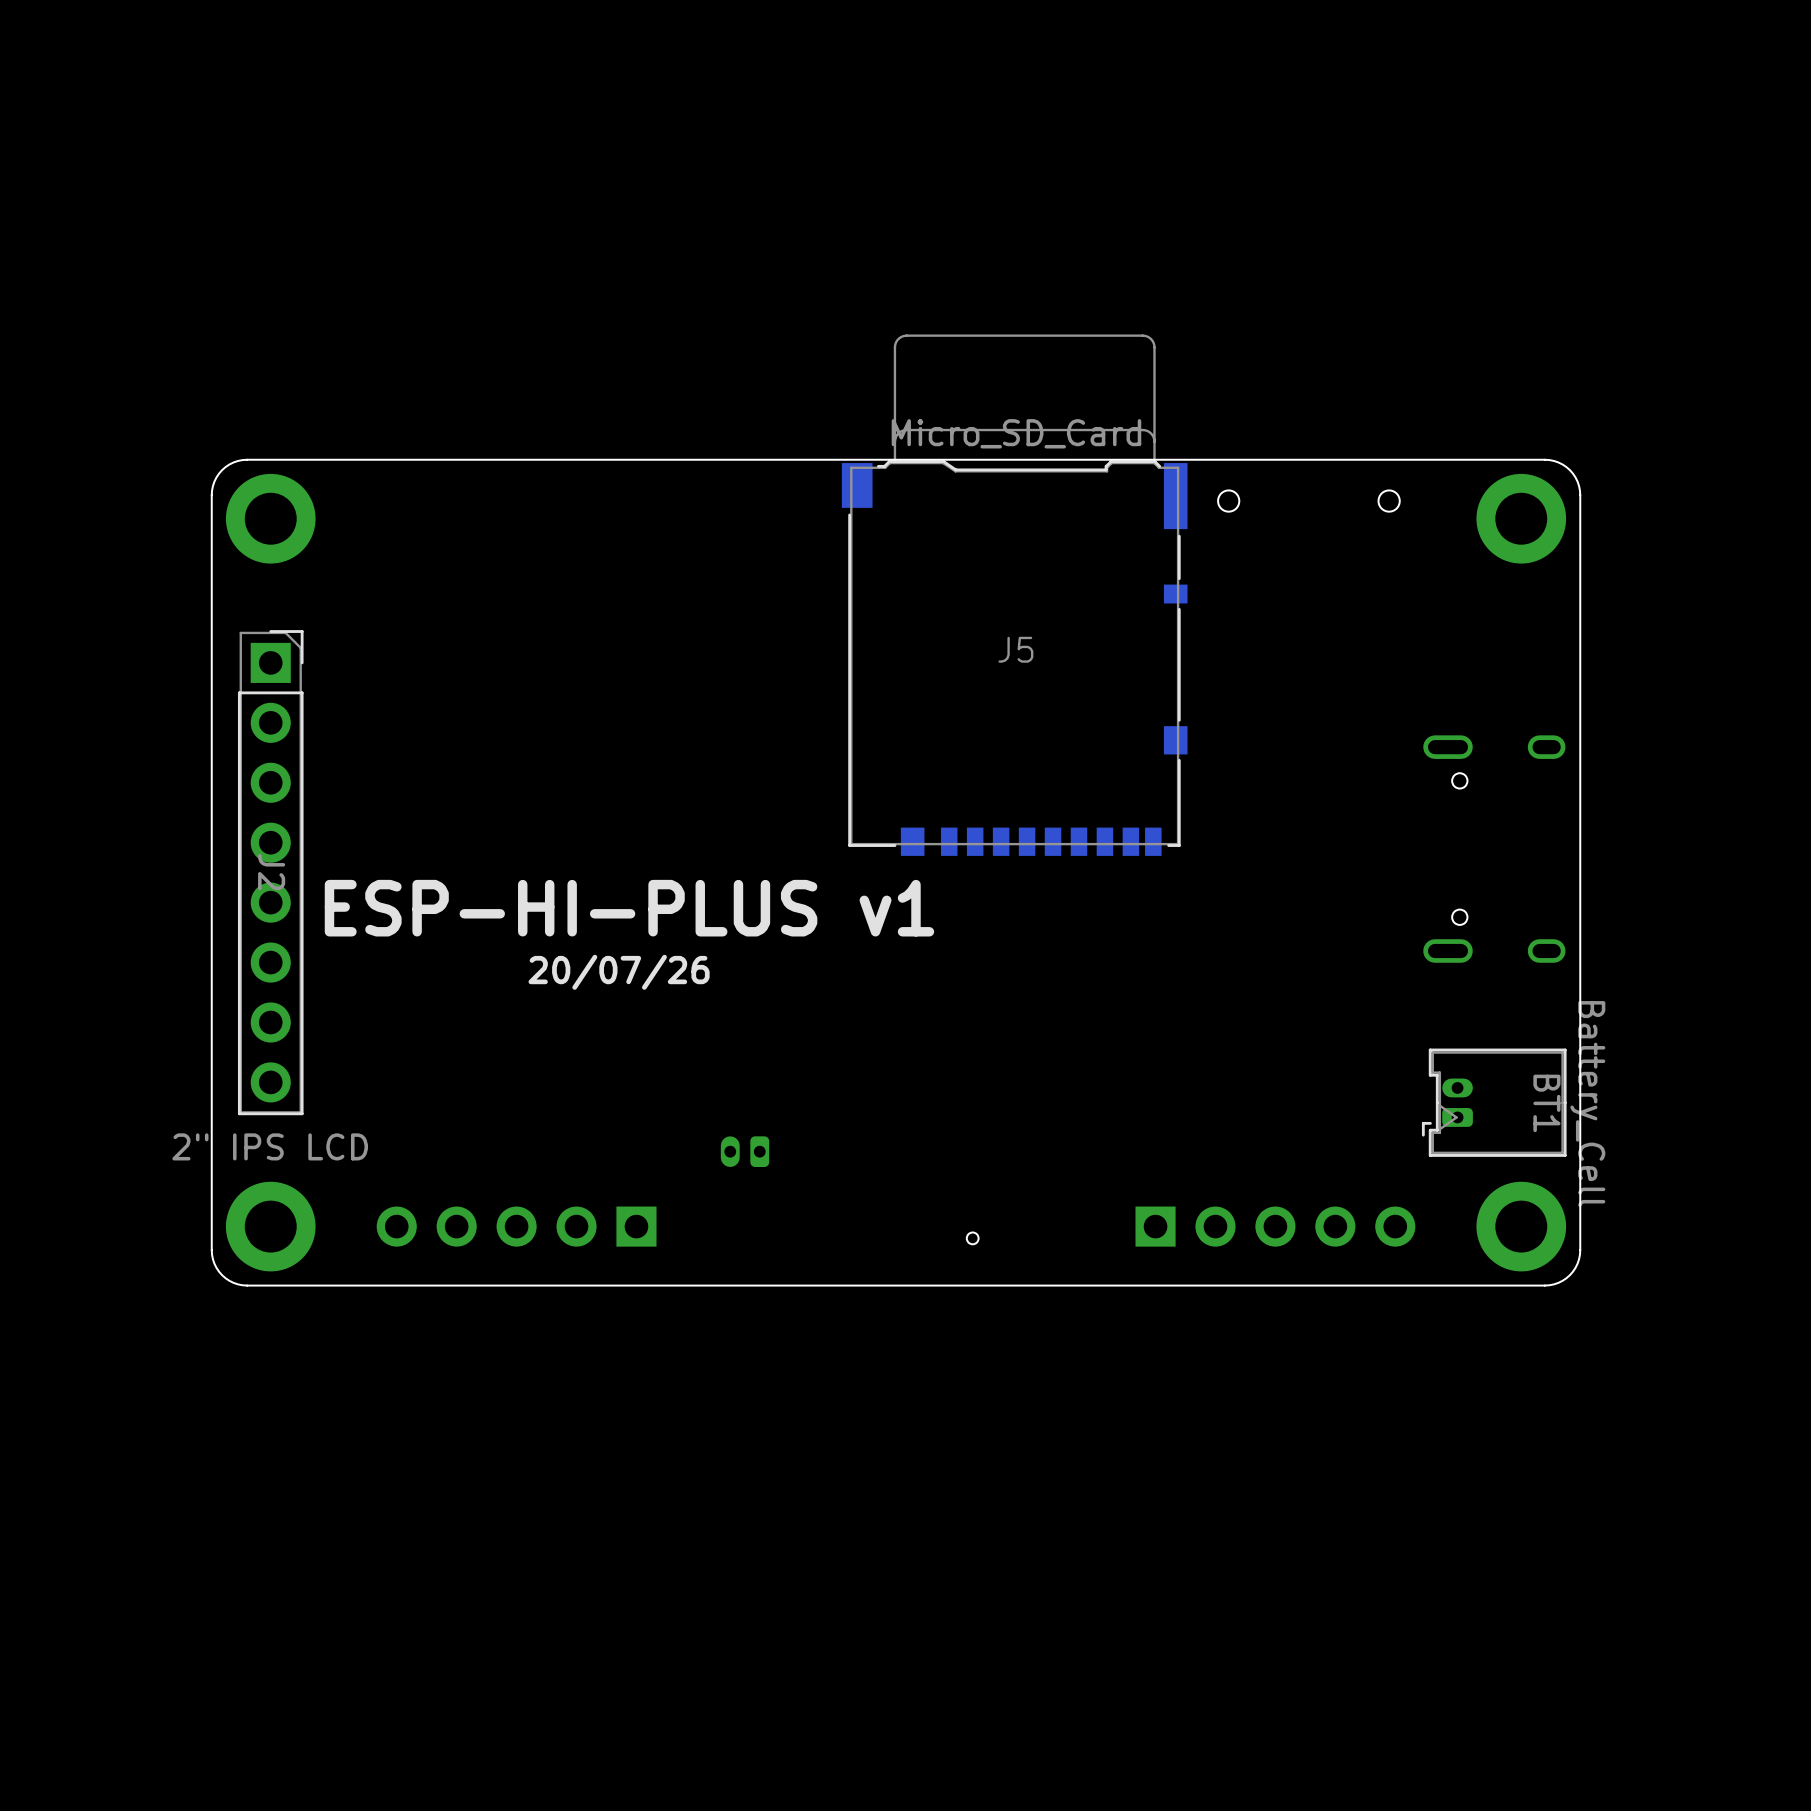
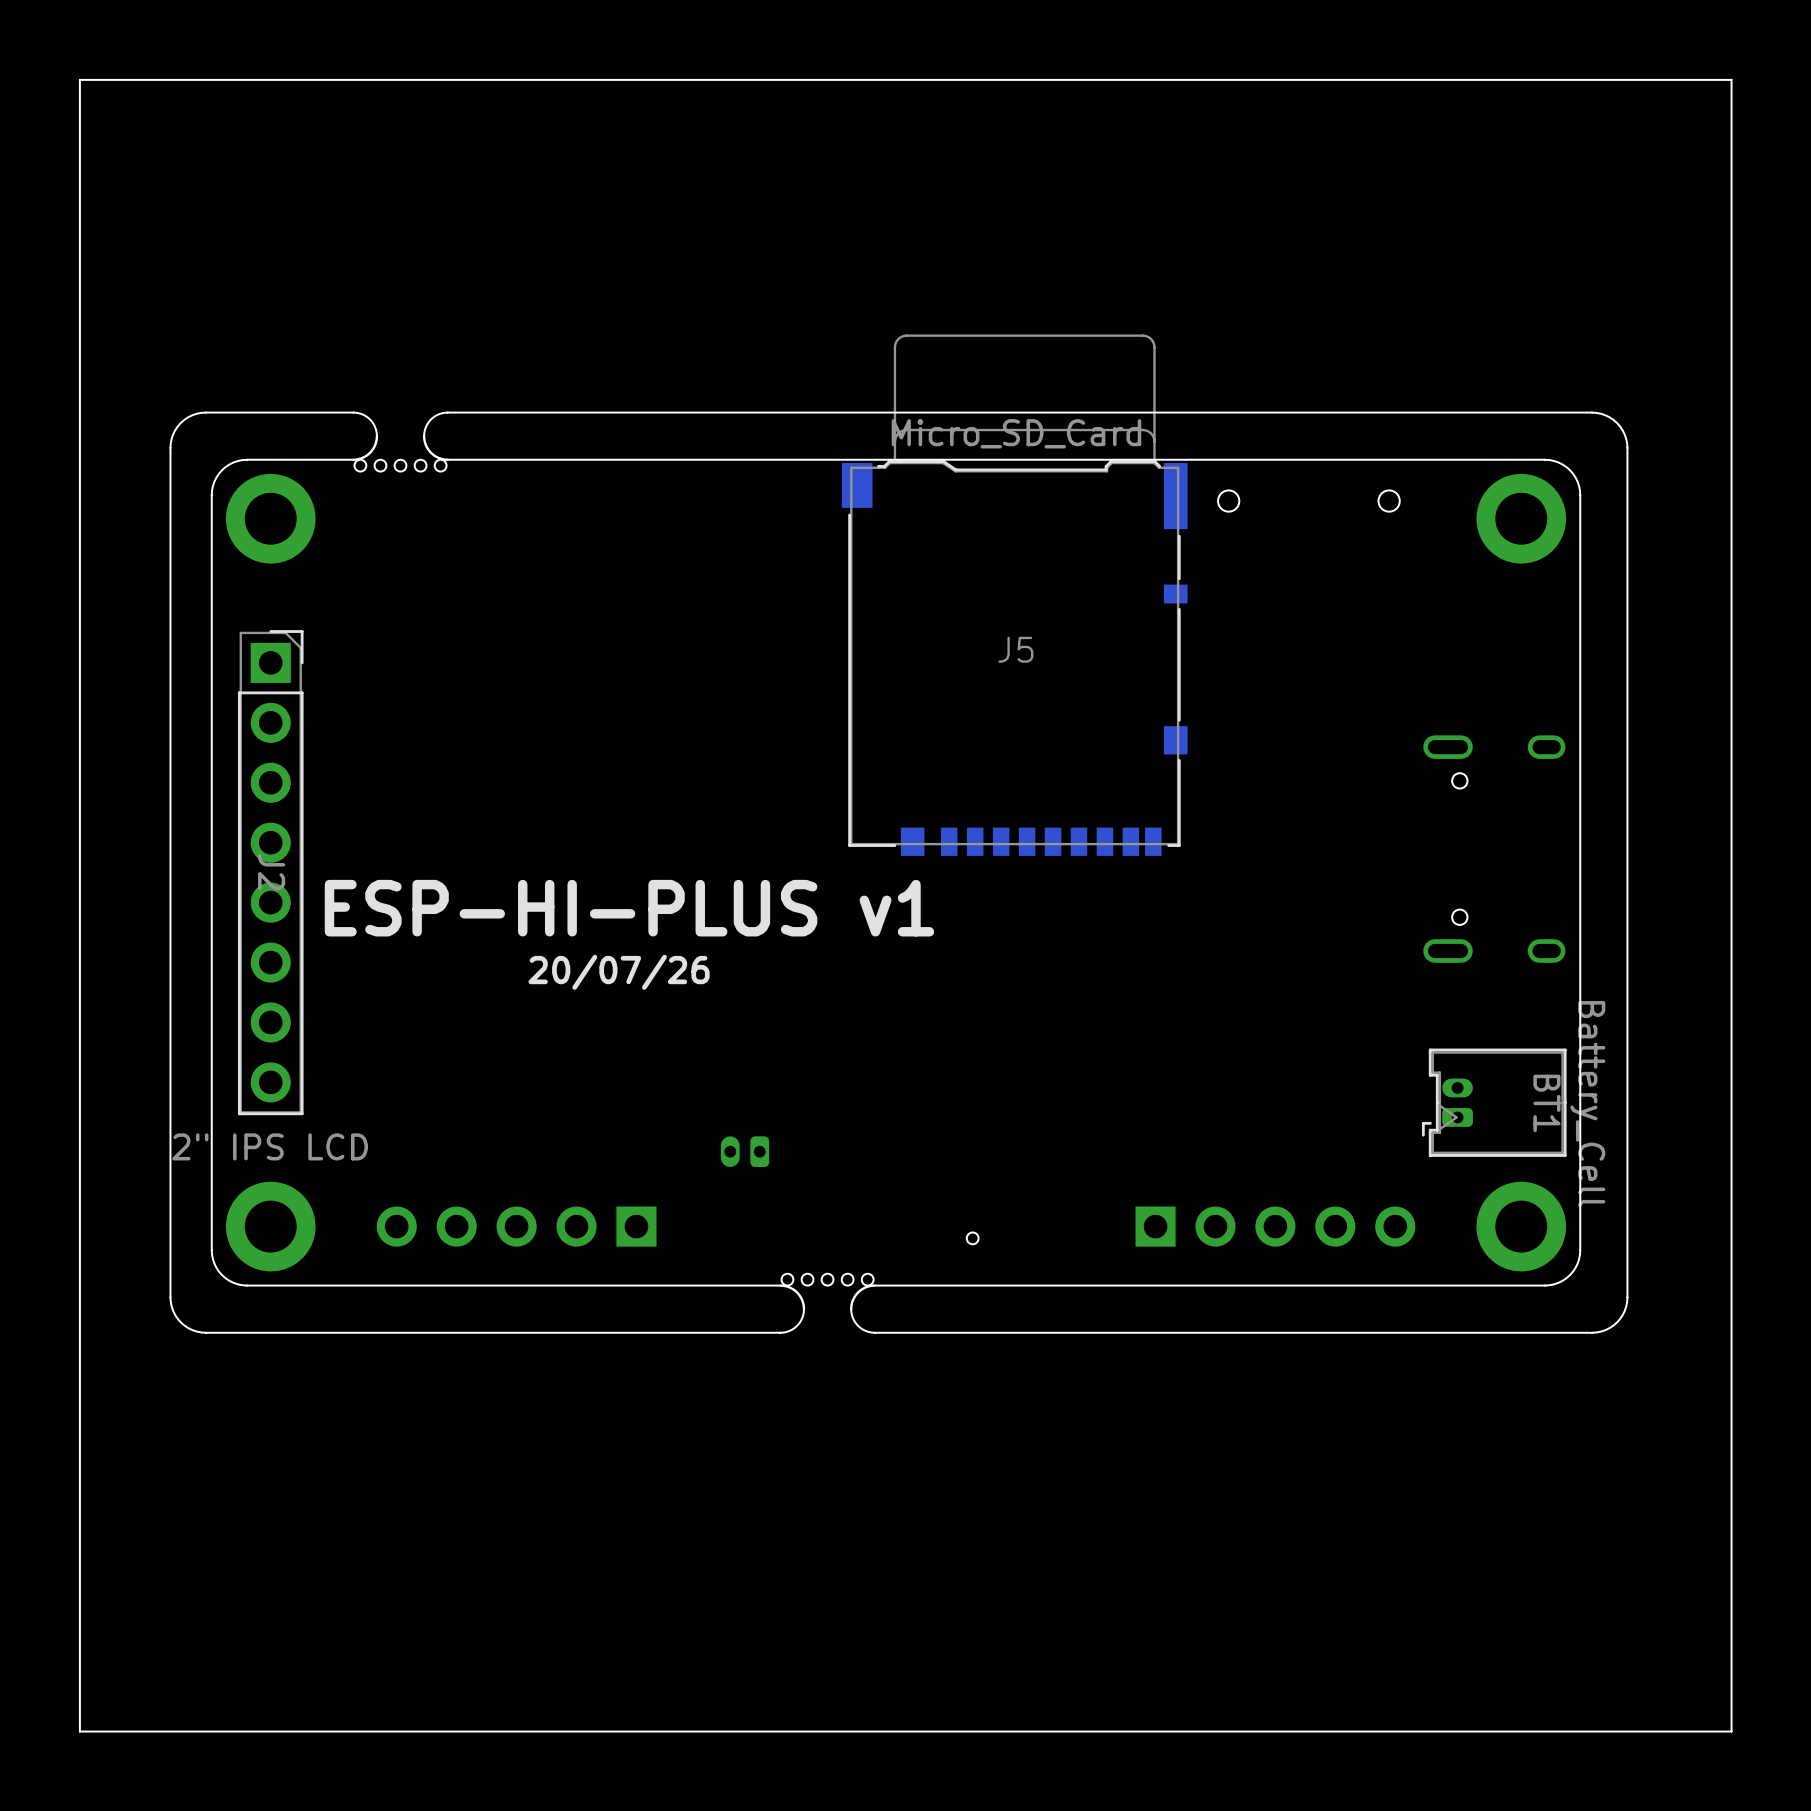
board edge: none -> (1731, 79) (79, 79) (79, 1731) (1731, 1731) (1731, 79)
board edge: none -> (376, 436) (371, 421) (363, 414) (355, 412) (205, 412) (192, 415) (184, 419) (177, 426) (171, 438) (170, 1297) (173, 1310) (177, 1318) (188, 1328) (205, 1332) (780, 1332) (789, 1330) (797, 1325) (802, 1318) (803, 1309)
board edge: none -> (424, 436) (425, 427) (431, 419) (438, 414) (447, 412) (1592, 412) (1605, 415) (1613, 419) (1624, 434) (1627, 447) (1627, 1297) (1624, 1310) (1617, 1322) (1605, 1330) (1592, 1332) (874, 1332) (865, 1330) (858, 1325) (852, 1318) (851, 1309)
part: none -> (400, 453)
board edge: (447, 459) (353, 459) -> none
board edge: (874, 1285) (780, 1285) -> none
part: none -> (827, 1292)

